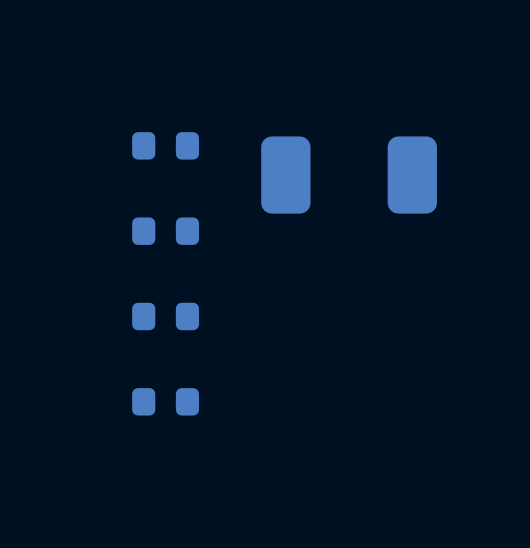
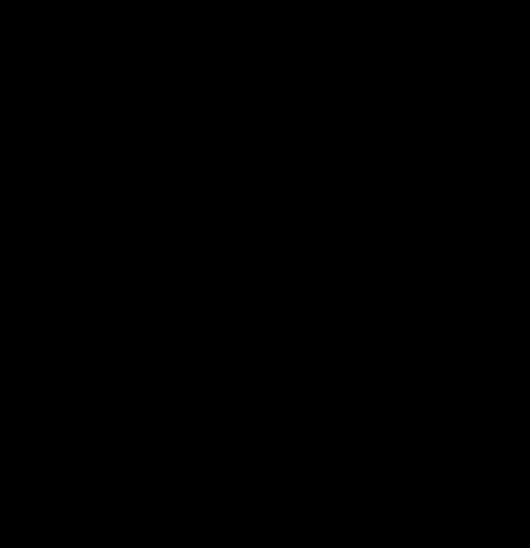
part: (165, 145) -> none
part: (349, 175) -> none
part: (165, 231) -> none
part: (165, 316) -> none
part: (165, 401) -> none

